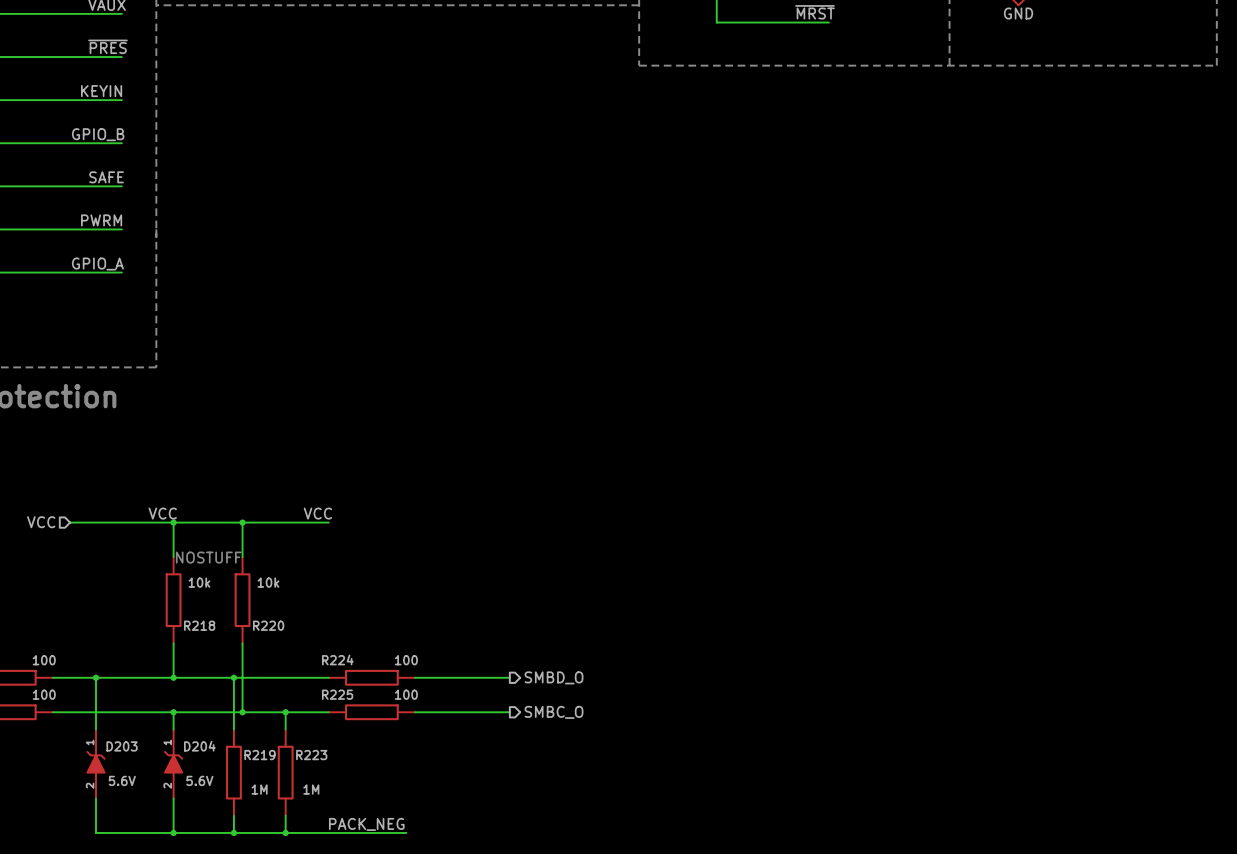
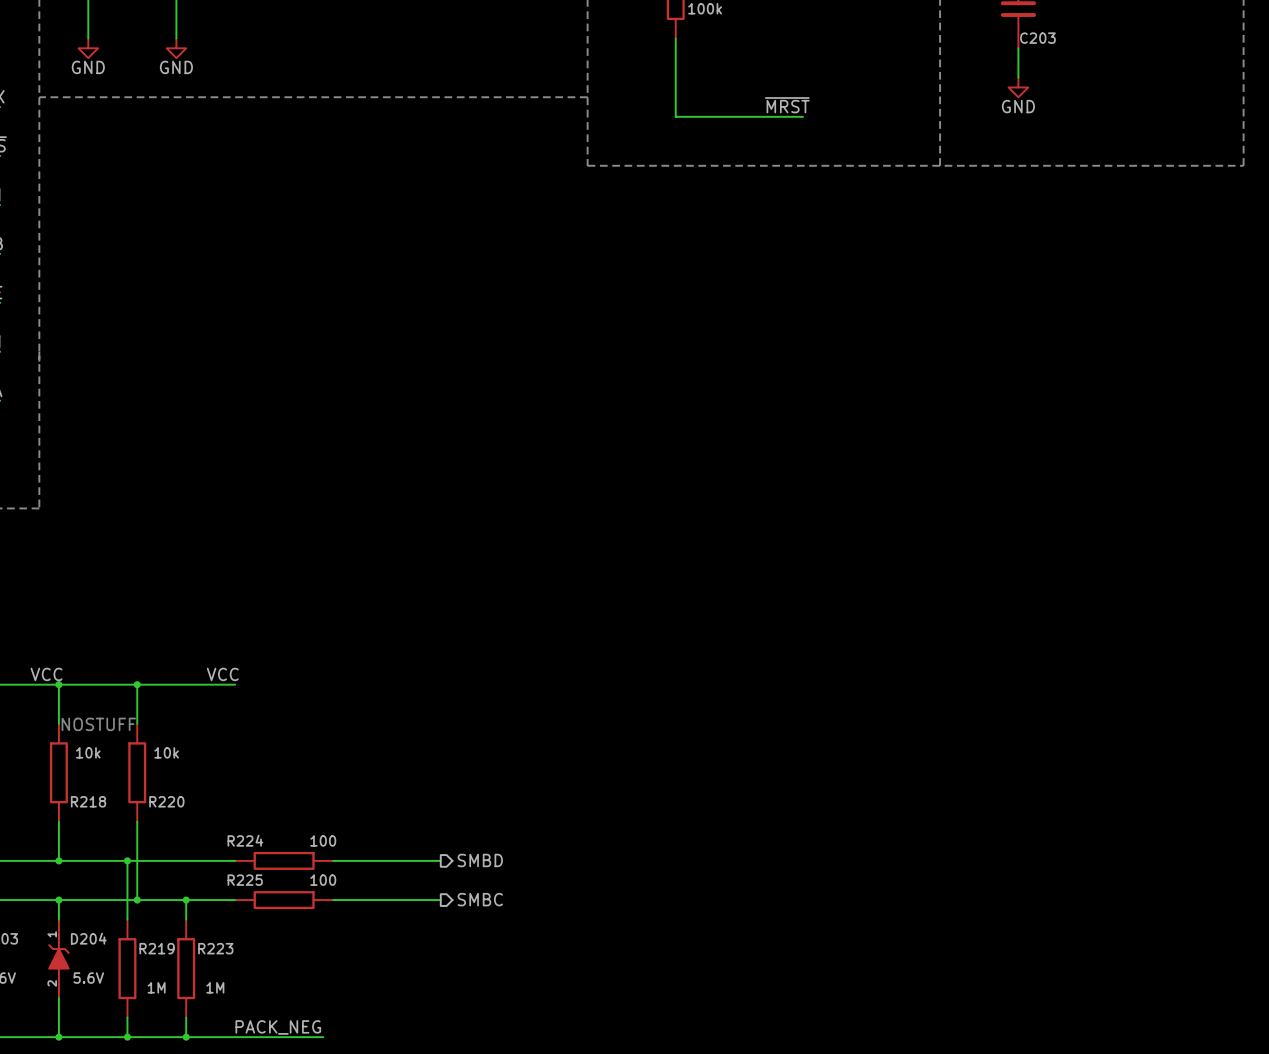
hierarchical label: SMBD_O (553, 677) -> SMBD (480, 860)
hierarchical label: SMBC_O (553, 712) -> SMBC (480, 899)

